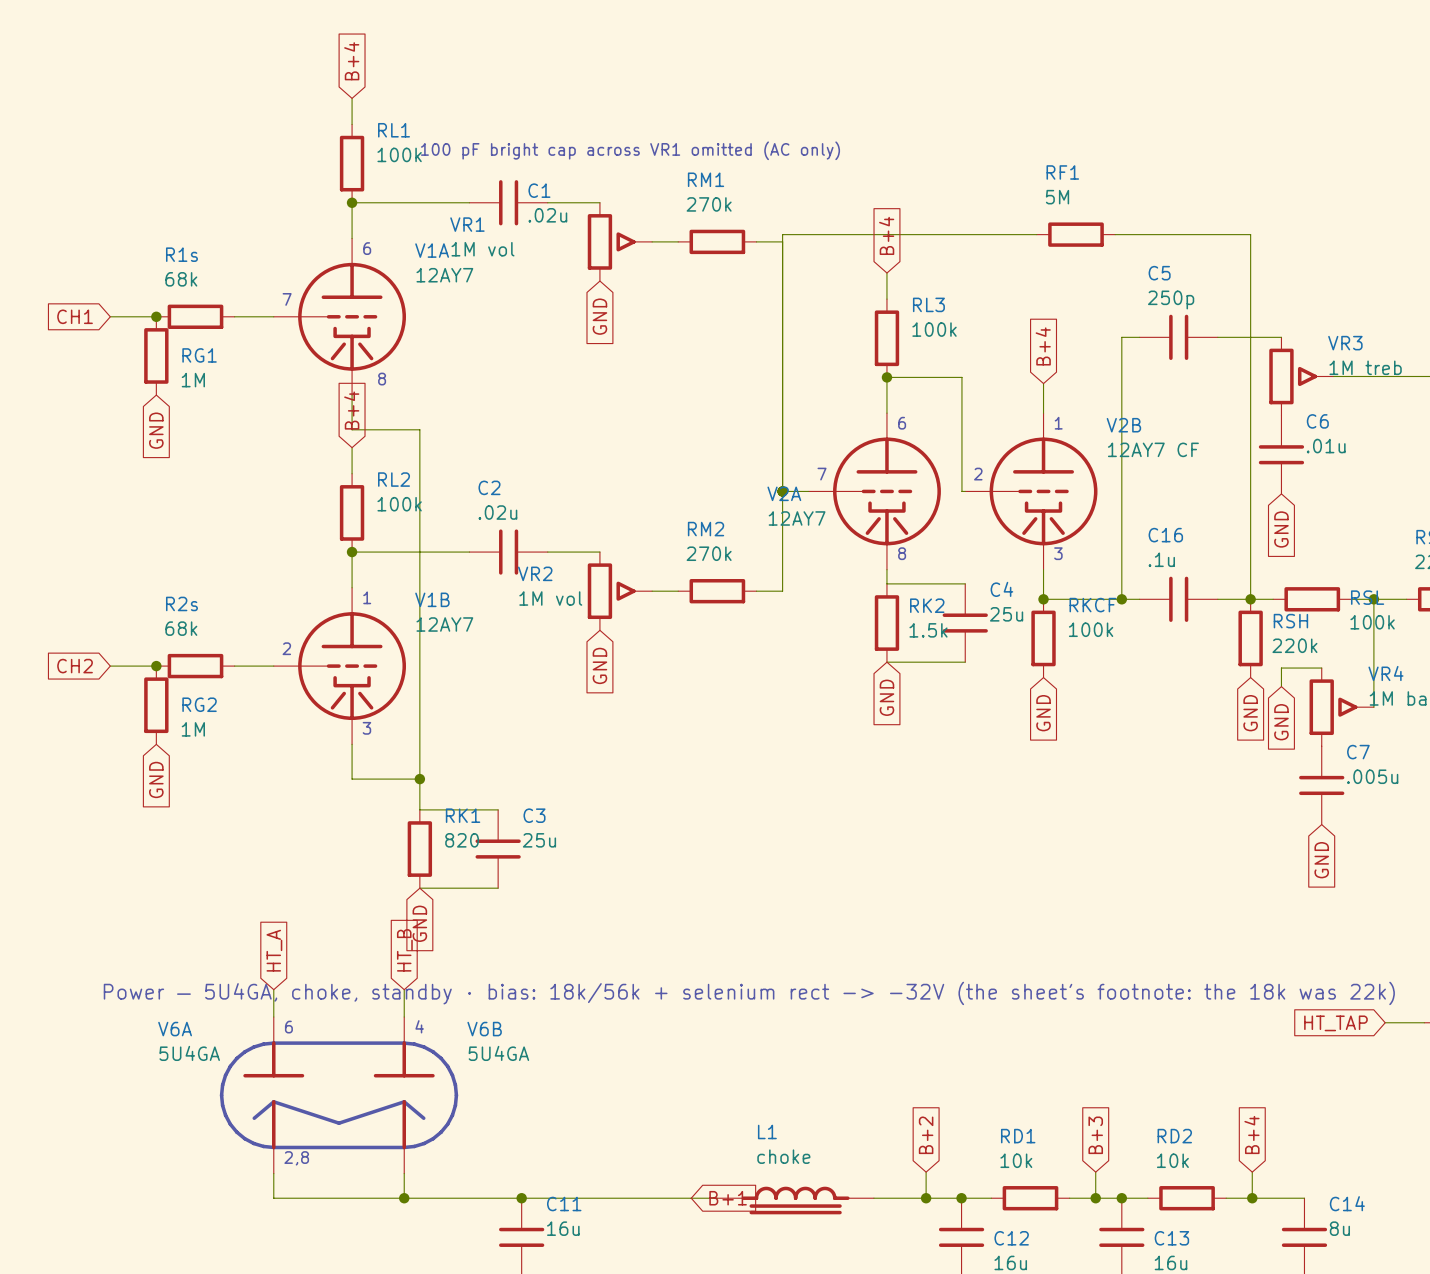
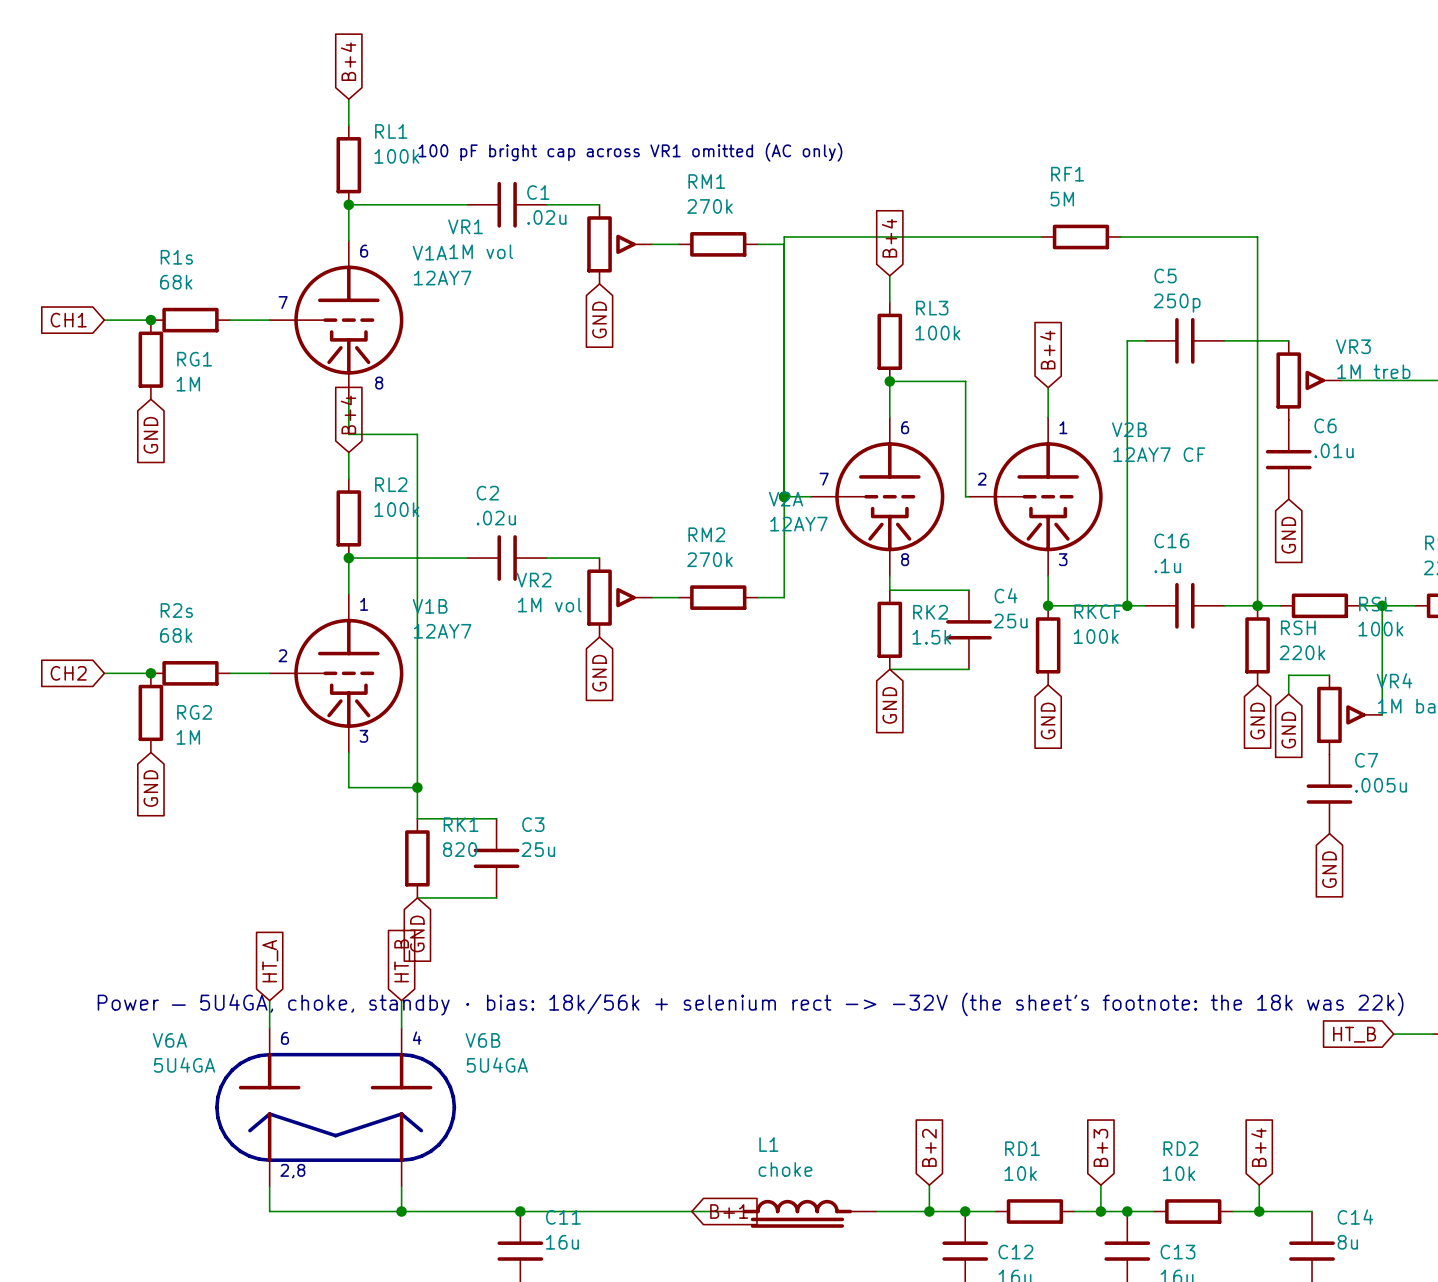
global label: HT_TAP (1335, 1023) -> HT_B (1354, 1034)

